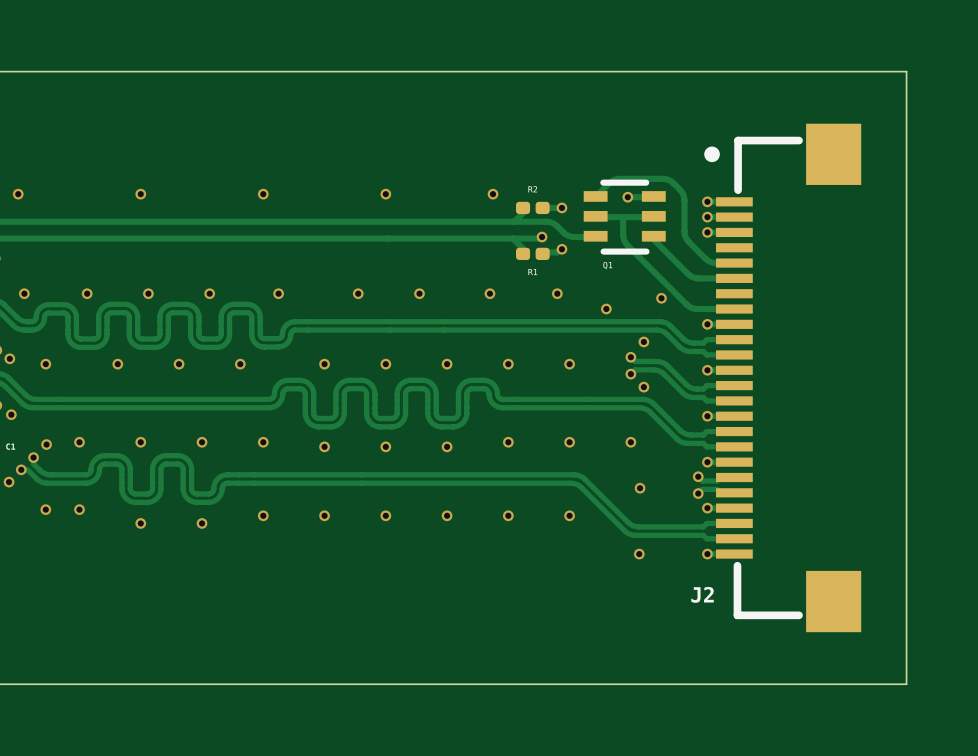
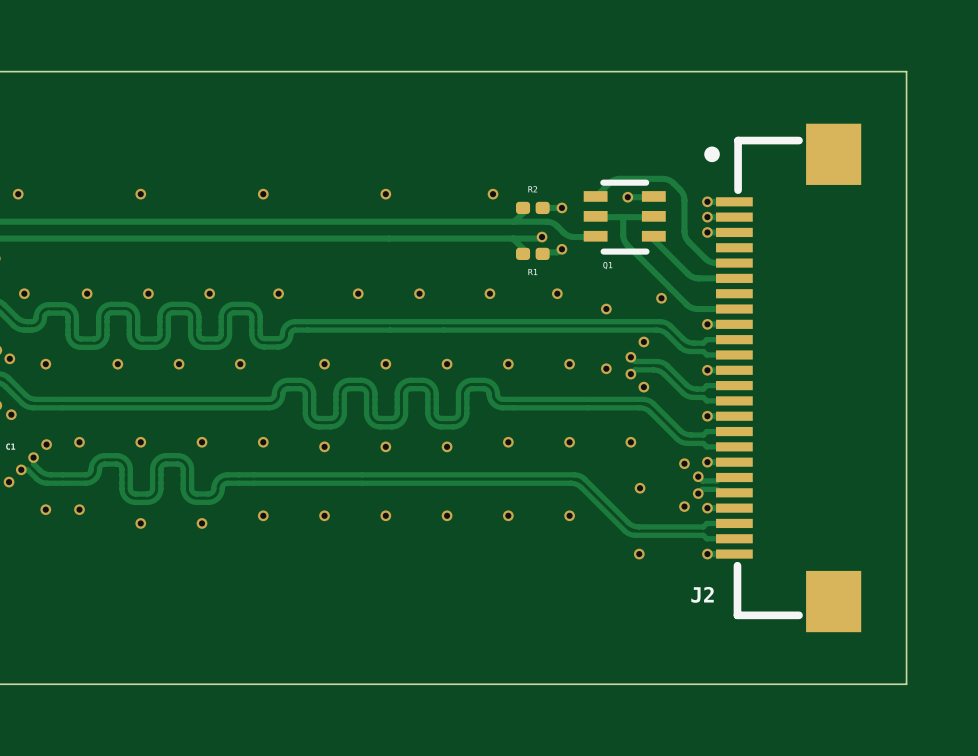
via: none -> (606, 368)
via: none -> (684, 463)
via: none -> (684, 506)

